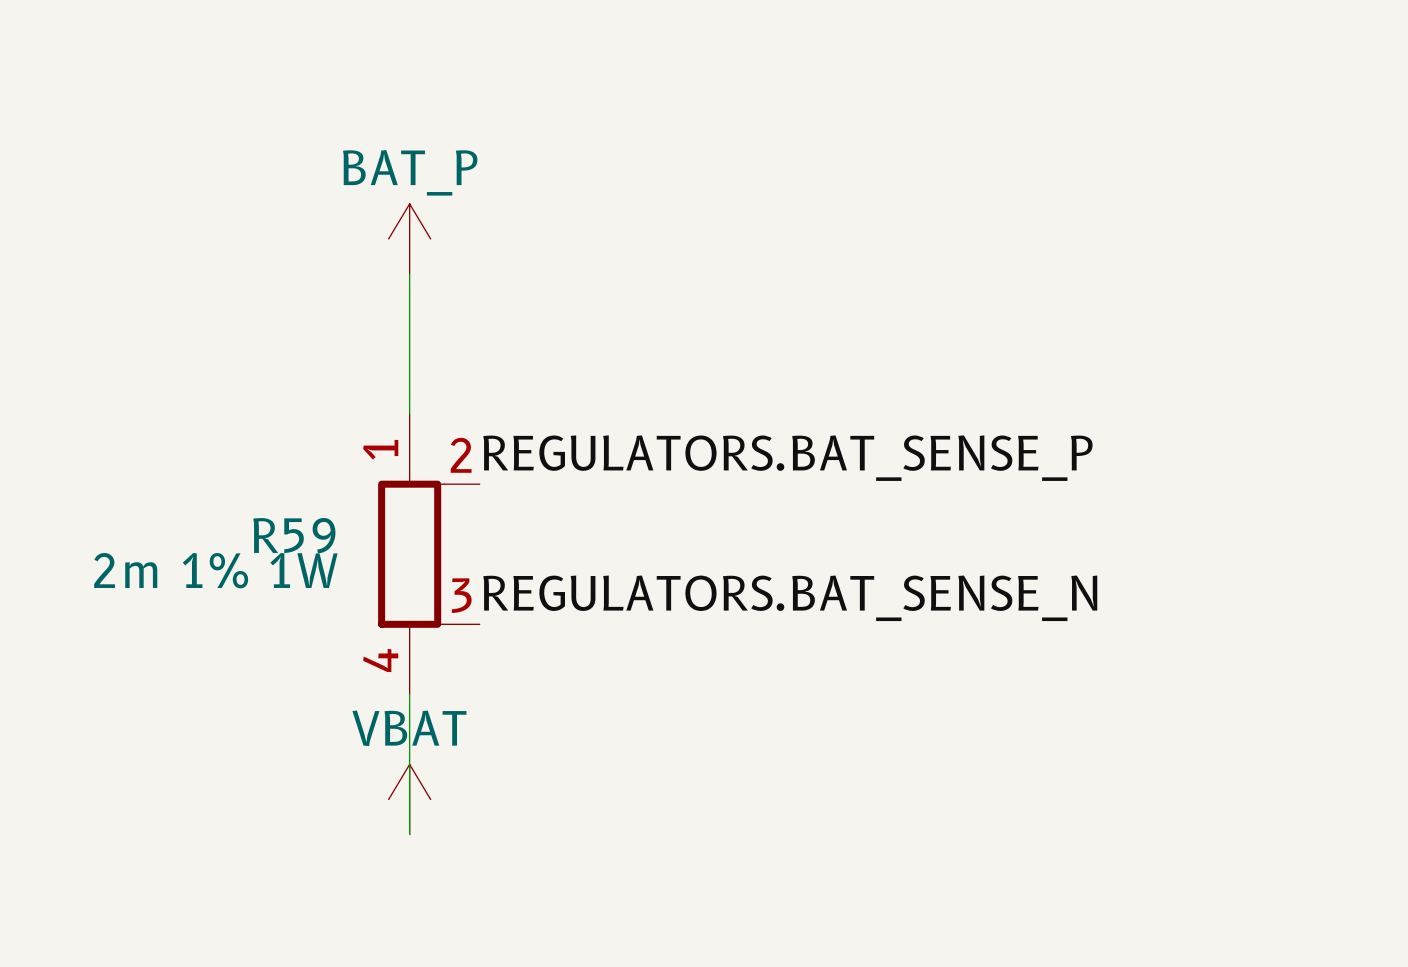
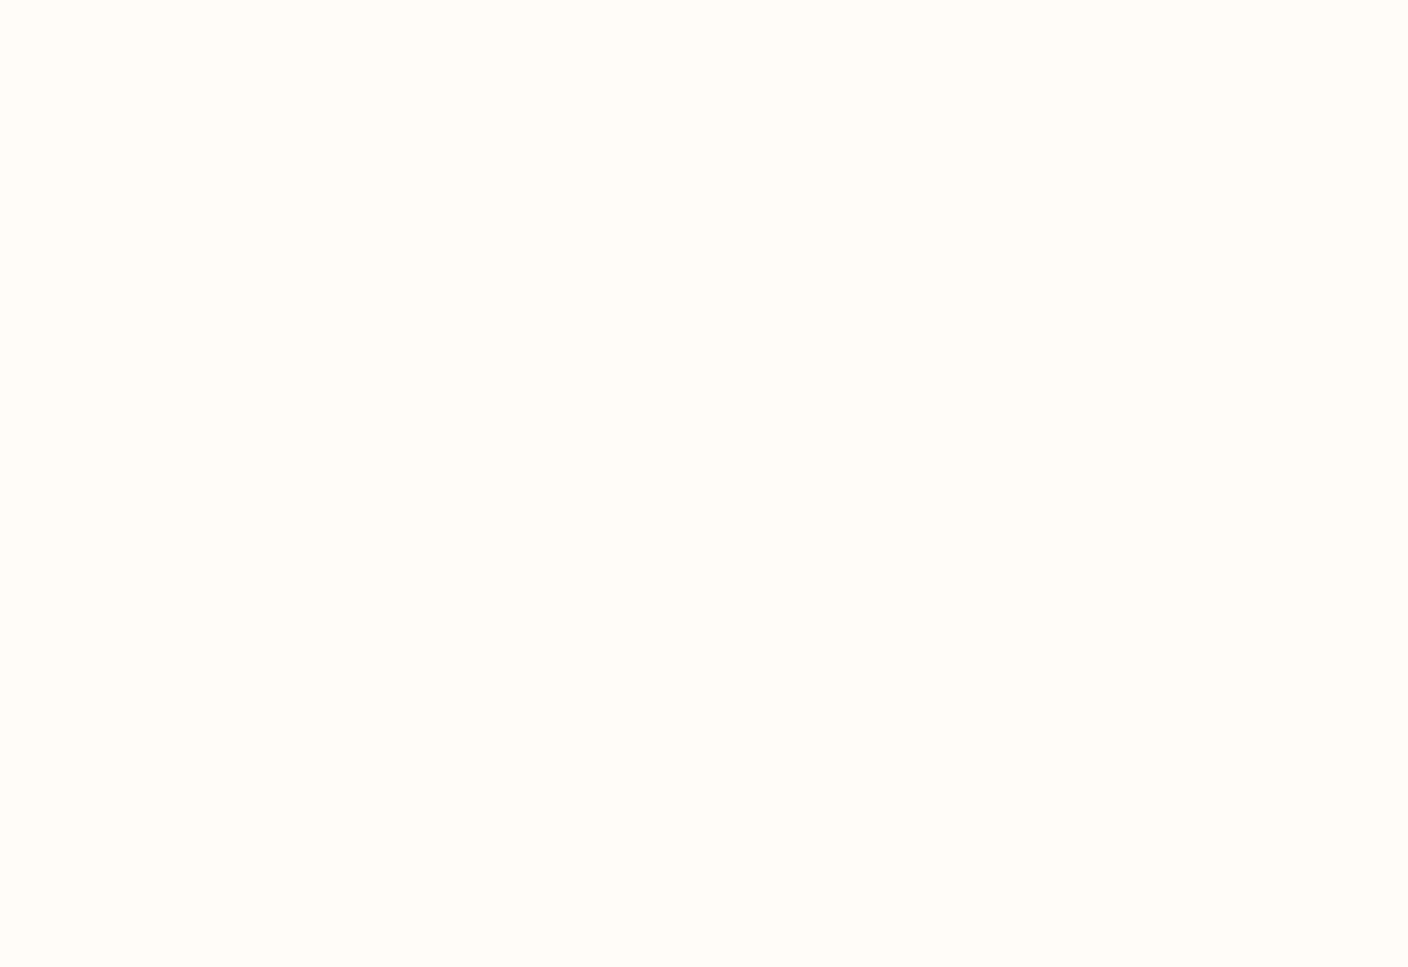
power symbol: BAT_P (409, 238) -> none
wire: (409, 273) (409, 414) -> none
label: REGULATORS.BAT_SENSE_P (787, 458) -> none
R59: 2m 1% 1W (428, 554) -> none
label: REGULATORS.BAT_SENSE_N (790, 598) -> none
wire: (409, 694) (409, 834) -> none
power symbol: VBAT (409, 799) -> none

